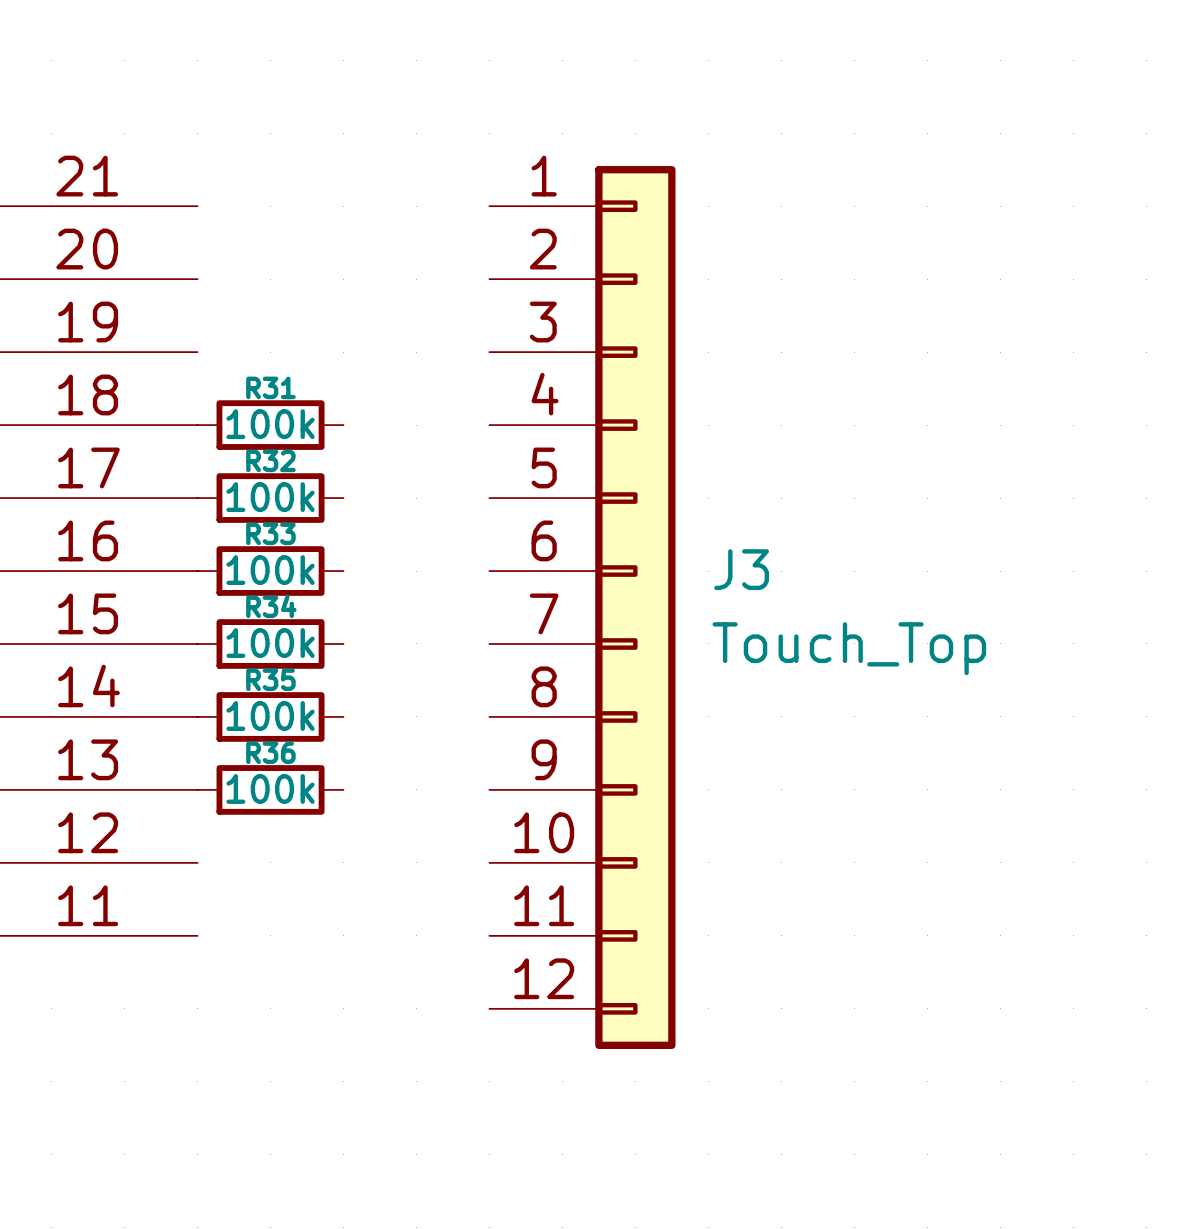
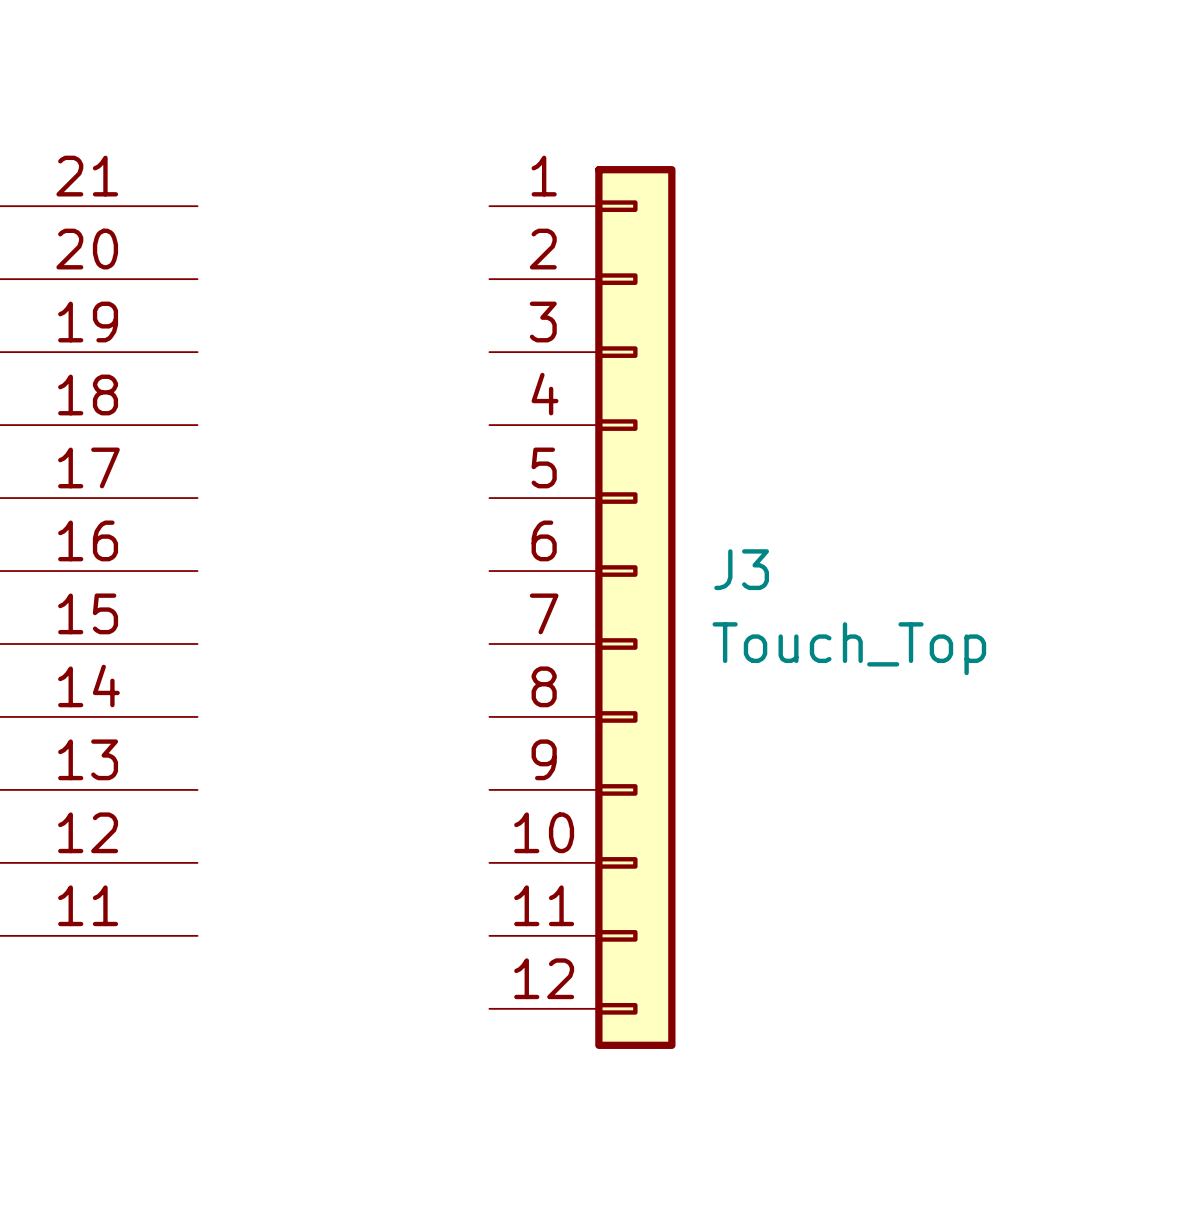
R31: 100k (270, 425) -> none
R32: 100k (270, 498) -> none
R33: 100k (270, 571) -> none
R34: 100k (270, 643) -> none
R35: 100k (270, 716) -> none
R36: 100k (270, 789) -> none

